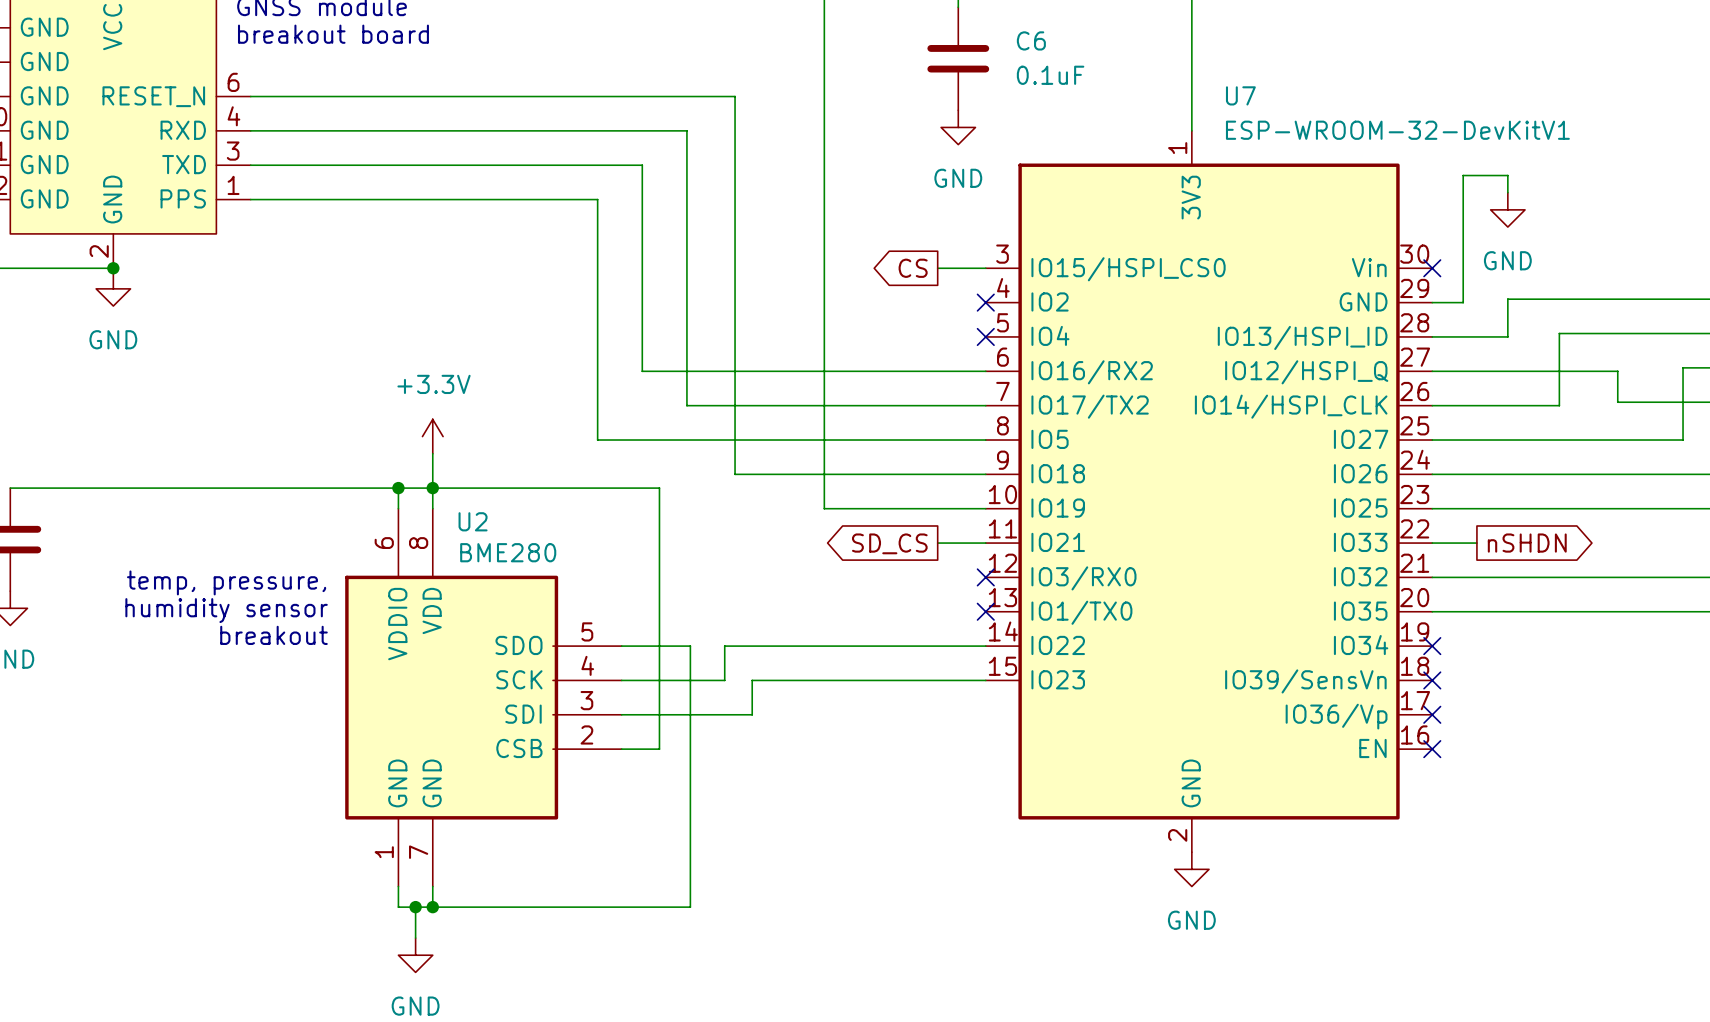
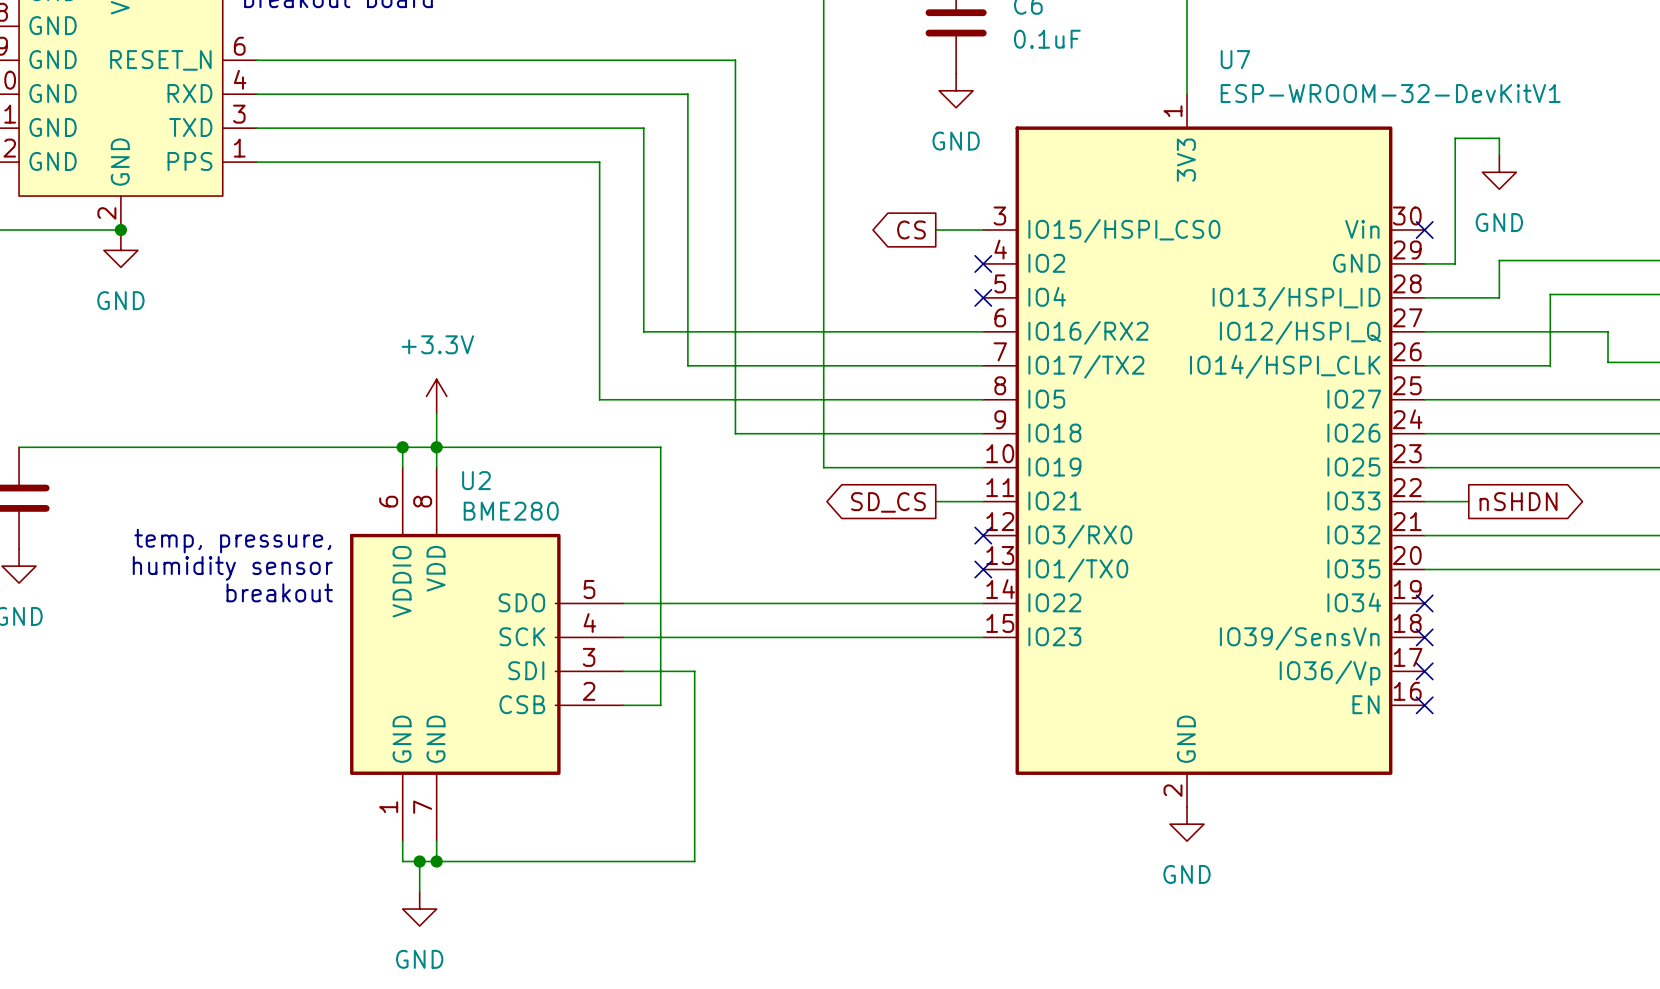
wire: (690, 646) (690, 907) -> (694, 671) (694, 861) (691, 861)
wire: none -> (691, 603) (725, 603)
wire: (724, 646) (724, 680) -> (752, 637) (725, 637)
wire: (752, 680) (752, 714) (693, 714) -> none

